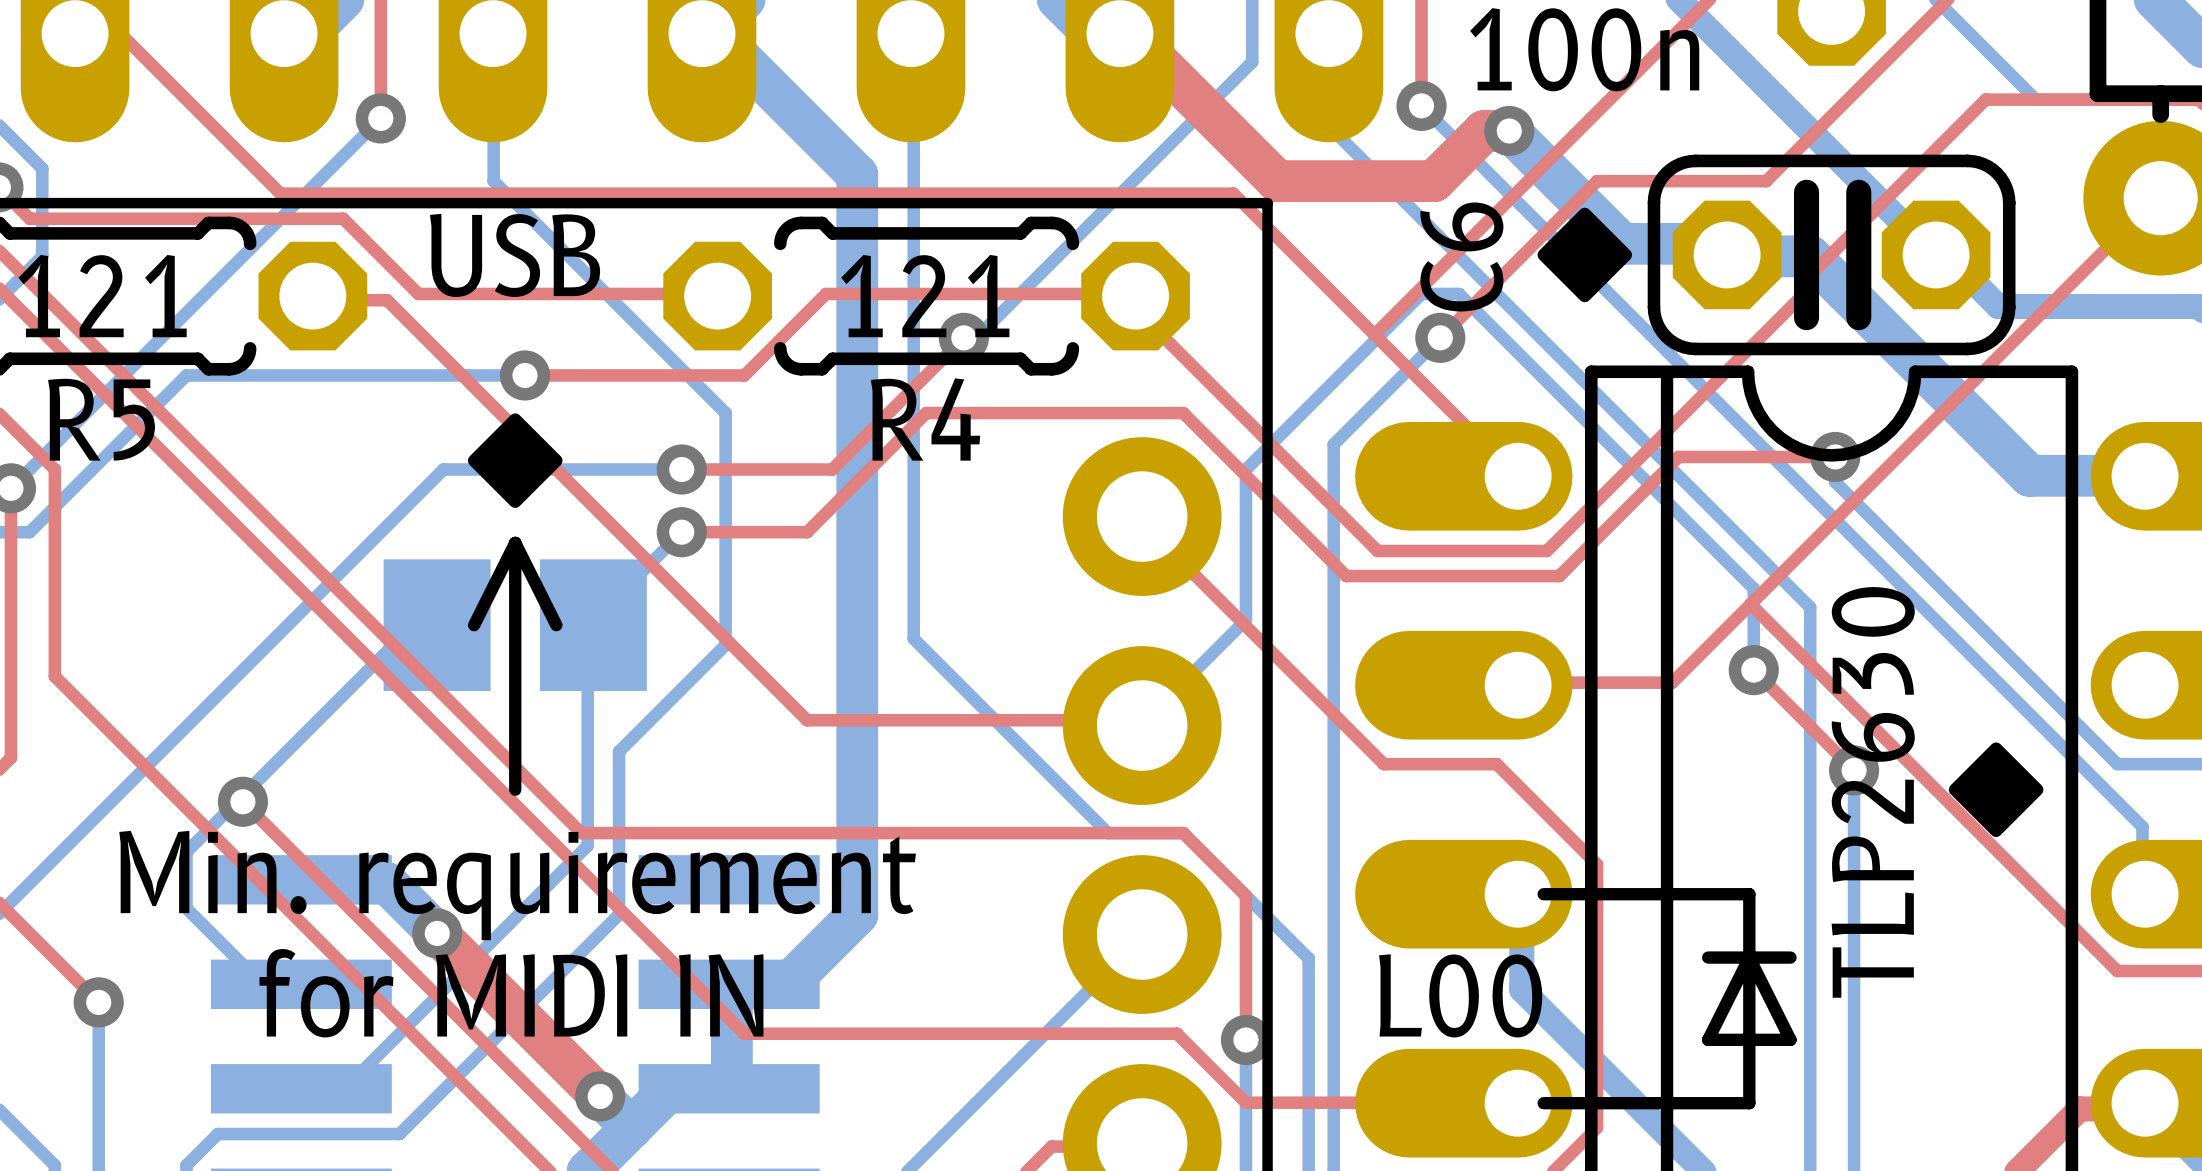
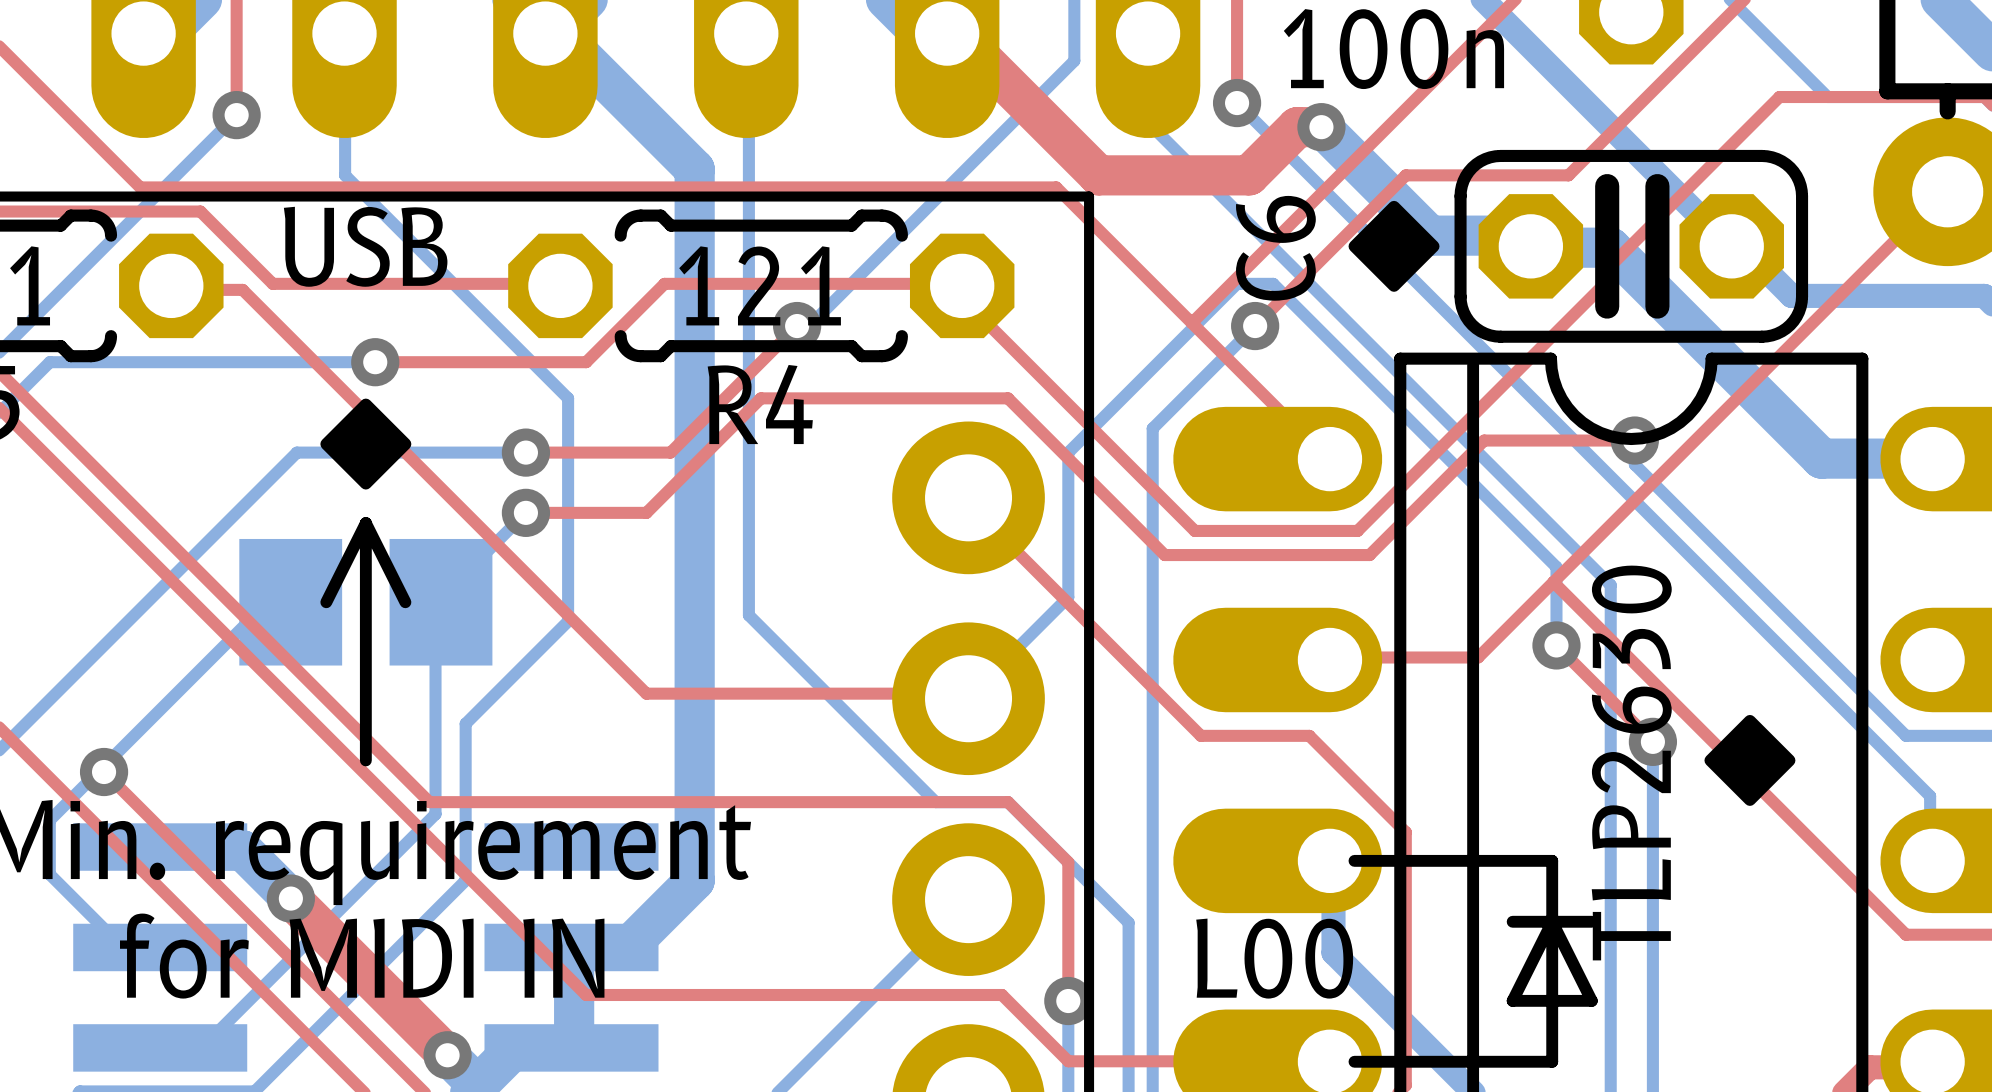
drawing position: (1996, 789) -> (1749, 760)
text position: TLP2630 (1873, 792) -> TLP2630 (1631, 763)

